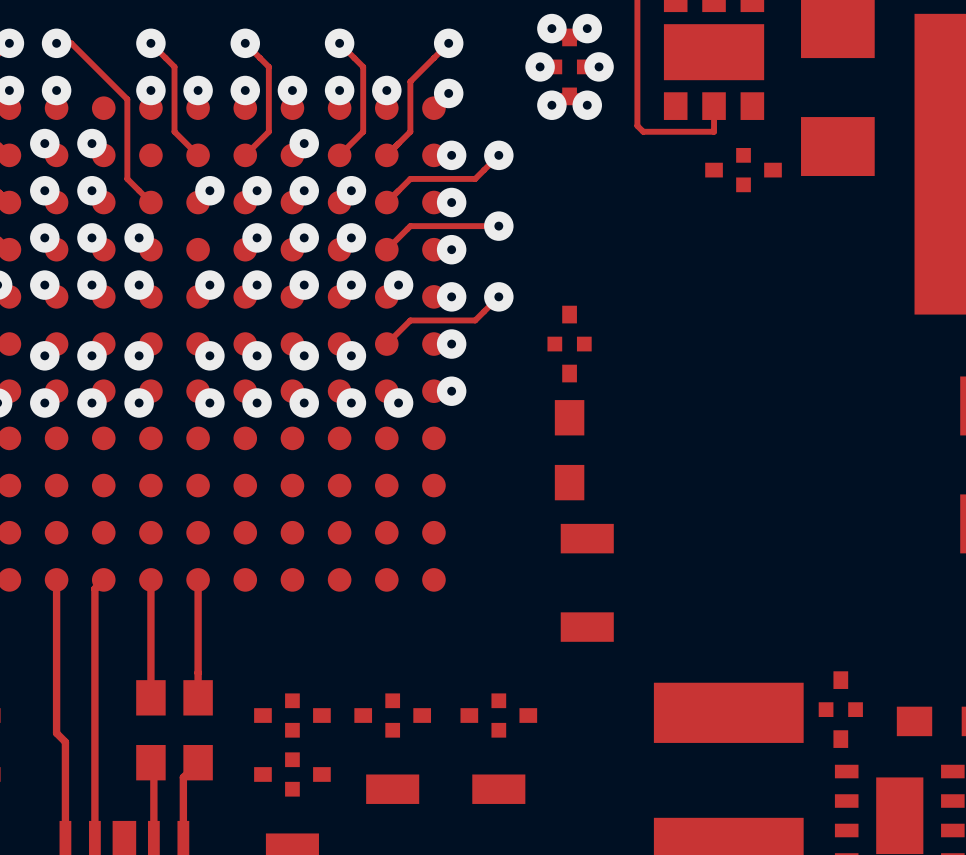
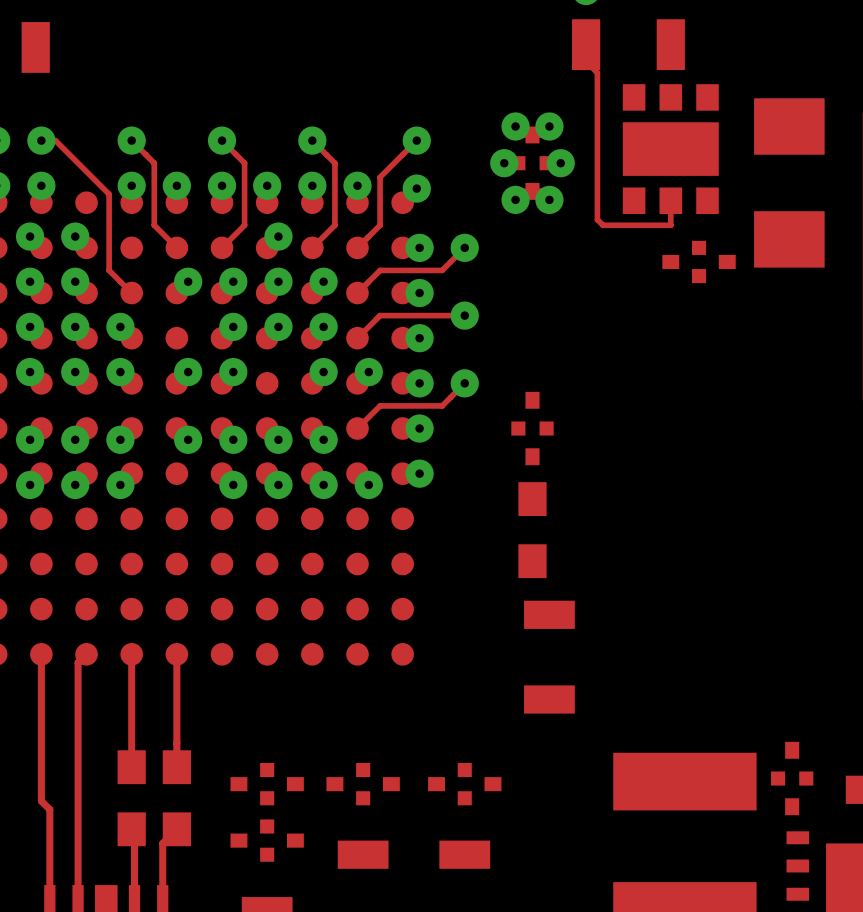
via: (304, 285) -> none
via: (209, 403) -> none

